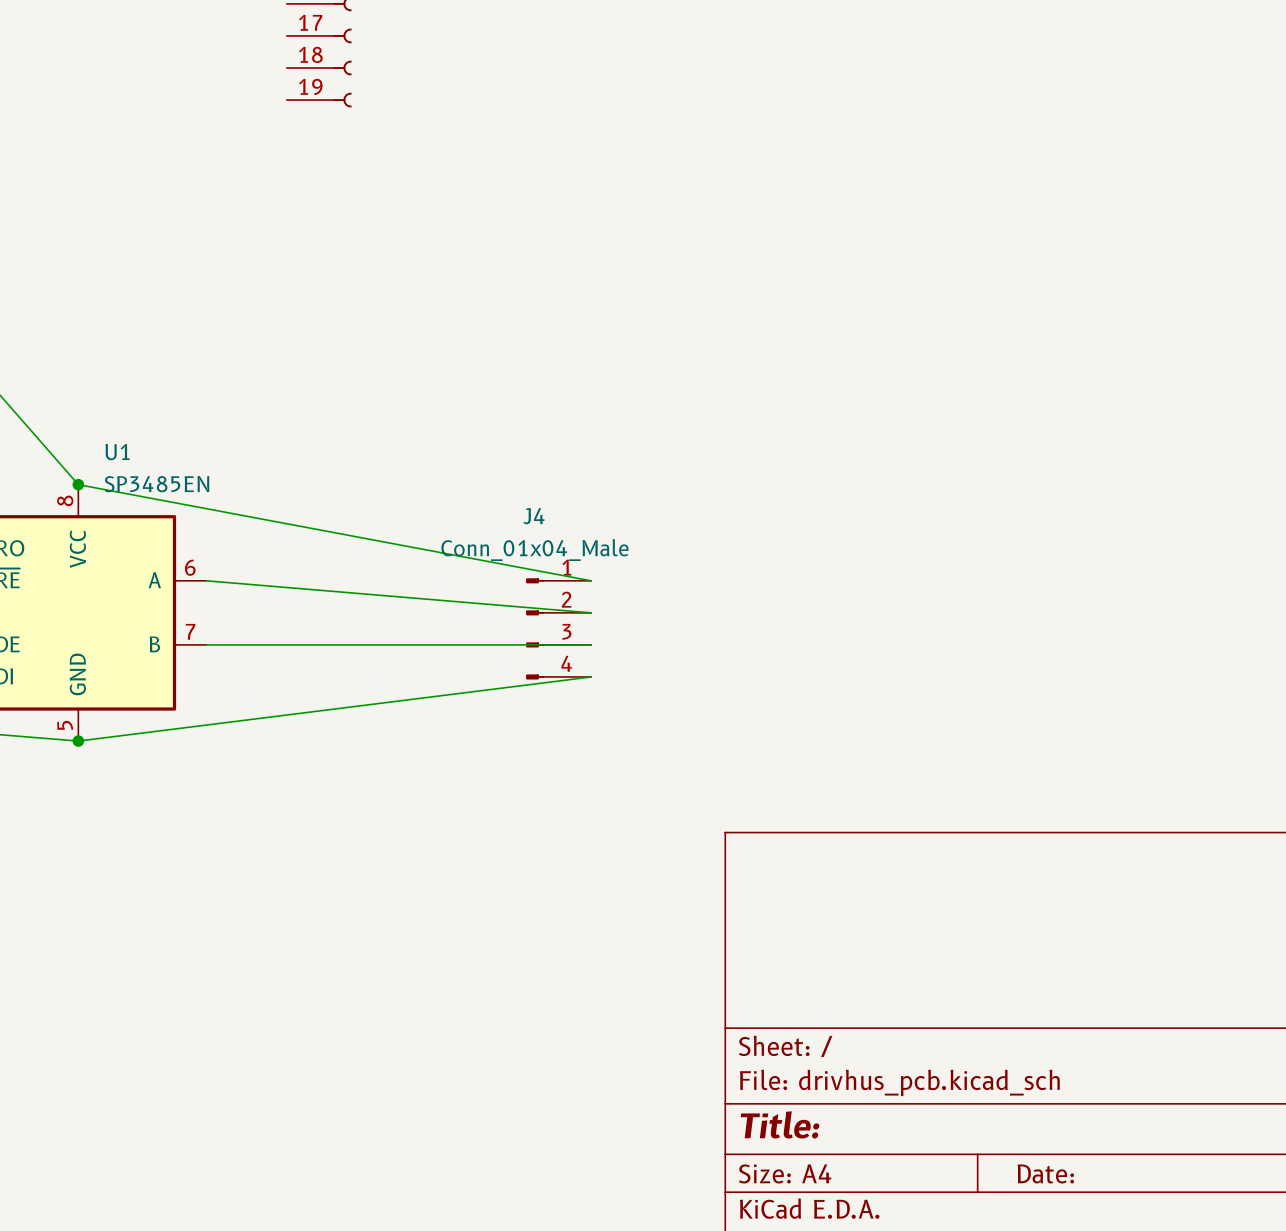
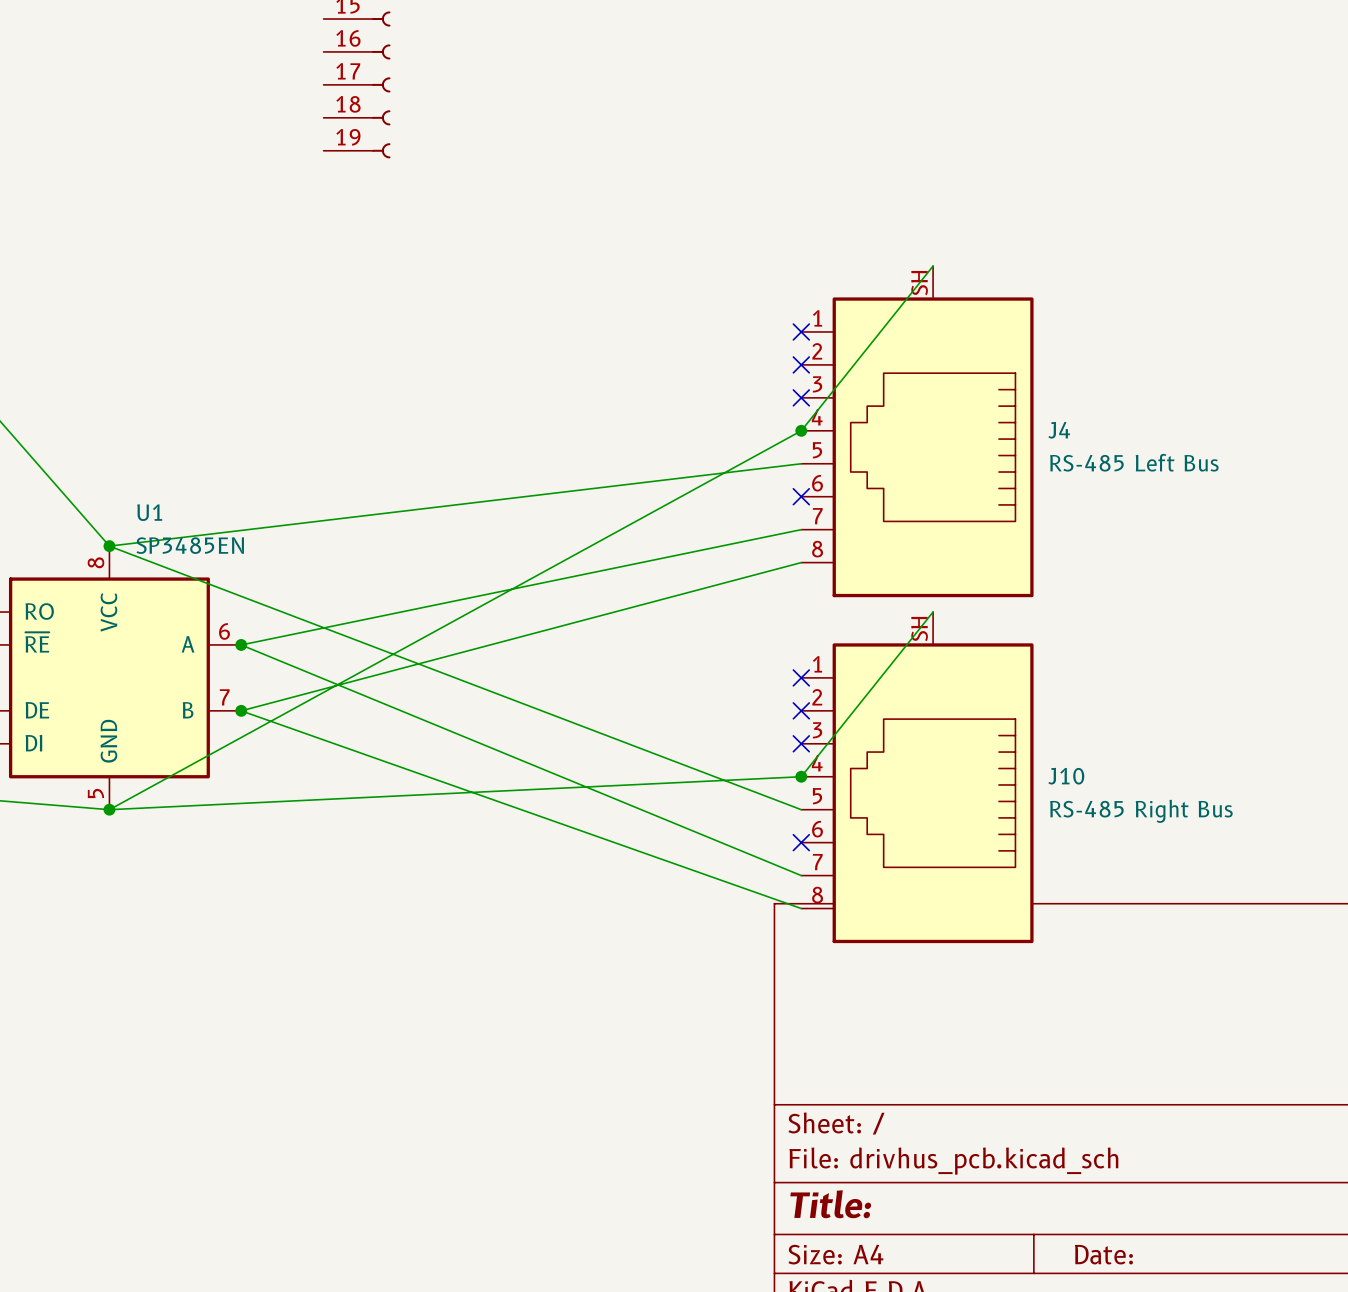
wire: none -> (933, 266) (801, 430) (109, 809) (801, 776) (933, 612)
no-connect mark: none -> (801, 331)
no-connect mark: none -> (801, 364)
no-connect mark: none -> (801, 397)
junction: none -> (801, 430)
wire: none -> (801, 463) (109, 546) (801, 809)
no-connect mark: none -> (801, 496)
wire: none -> (801, 529) (241, 644) (801, 875)
wire: (78, 484) (591, 580) -> none
wire: none -> (801, 562) (241, 710) (801, 908)
J4 name position: J4 (534, 516) -> J4 (1059, 430)
J4 value: Conn_01x04_Male (534, 550) -> RS-485 Left Bus (1134, 462)
J4 symbol: [526, 578, 592, 680] -> [801, 266, 1034, 598]
wire: (206, 580) (591, 612) -> none
junction: none -> (241, 644)
no-connect mark: none -> (801, 677)
wire: (206, 644) (591, 644) -> none
junction: none -> (241, 710)
no-connect mark: none -> (801, 710)
wire: (591, 676) (78, 741) -> none
no-connect mark: none -> (801, 743)
junction: none -> (801, 776)
J10: none -> RS-485 Right Bus (917, 777)
no-connect mark: none -> (801, 842)

